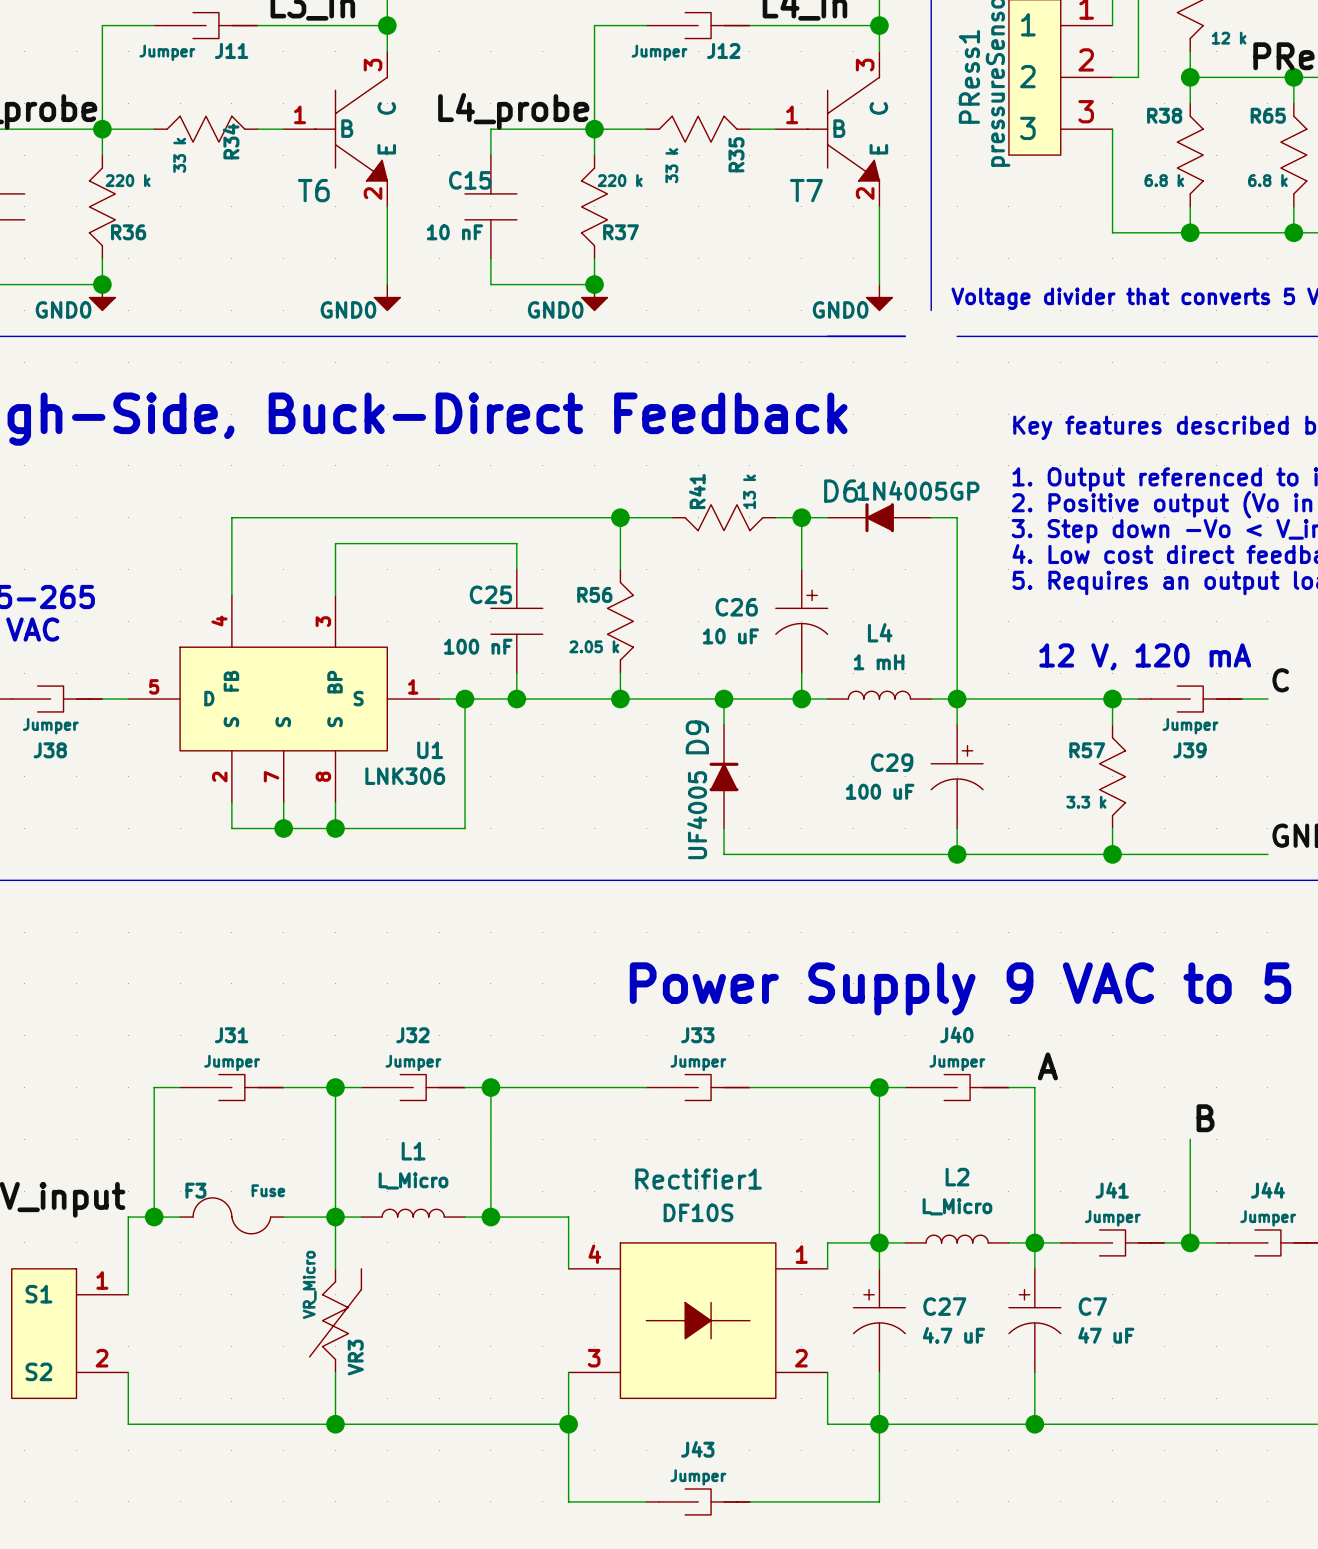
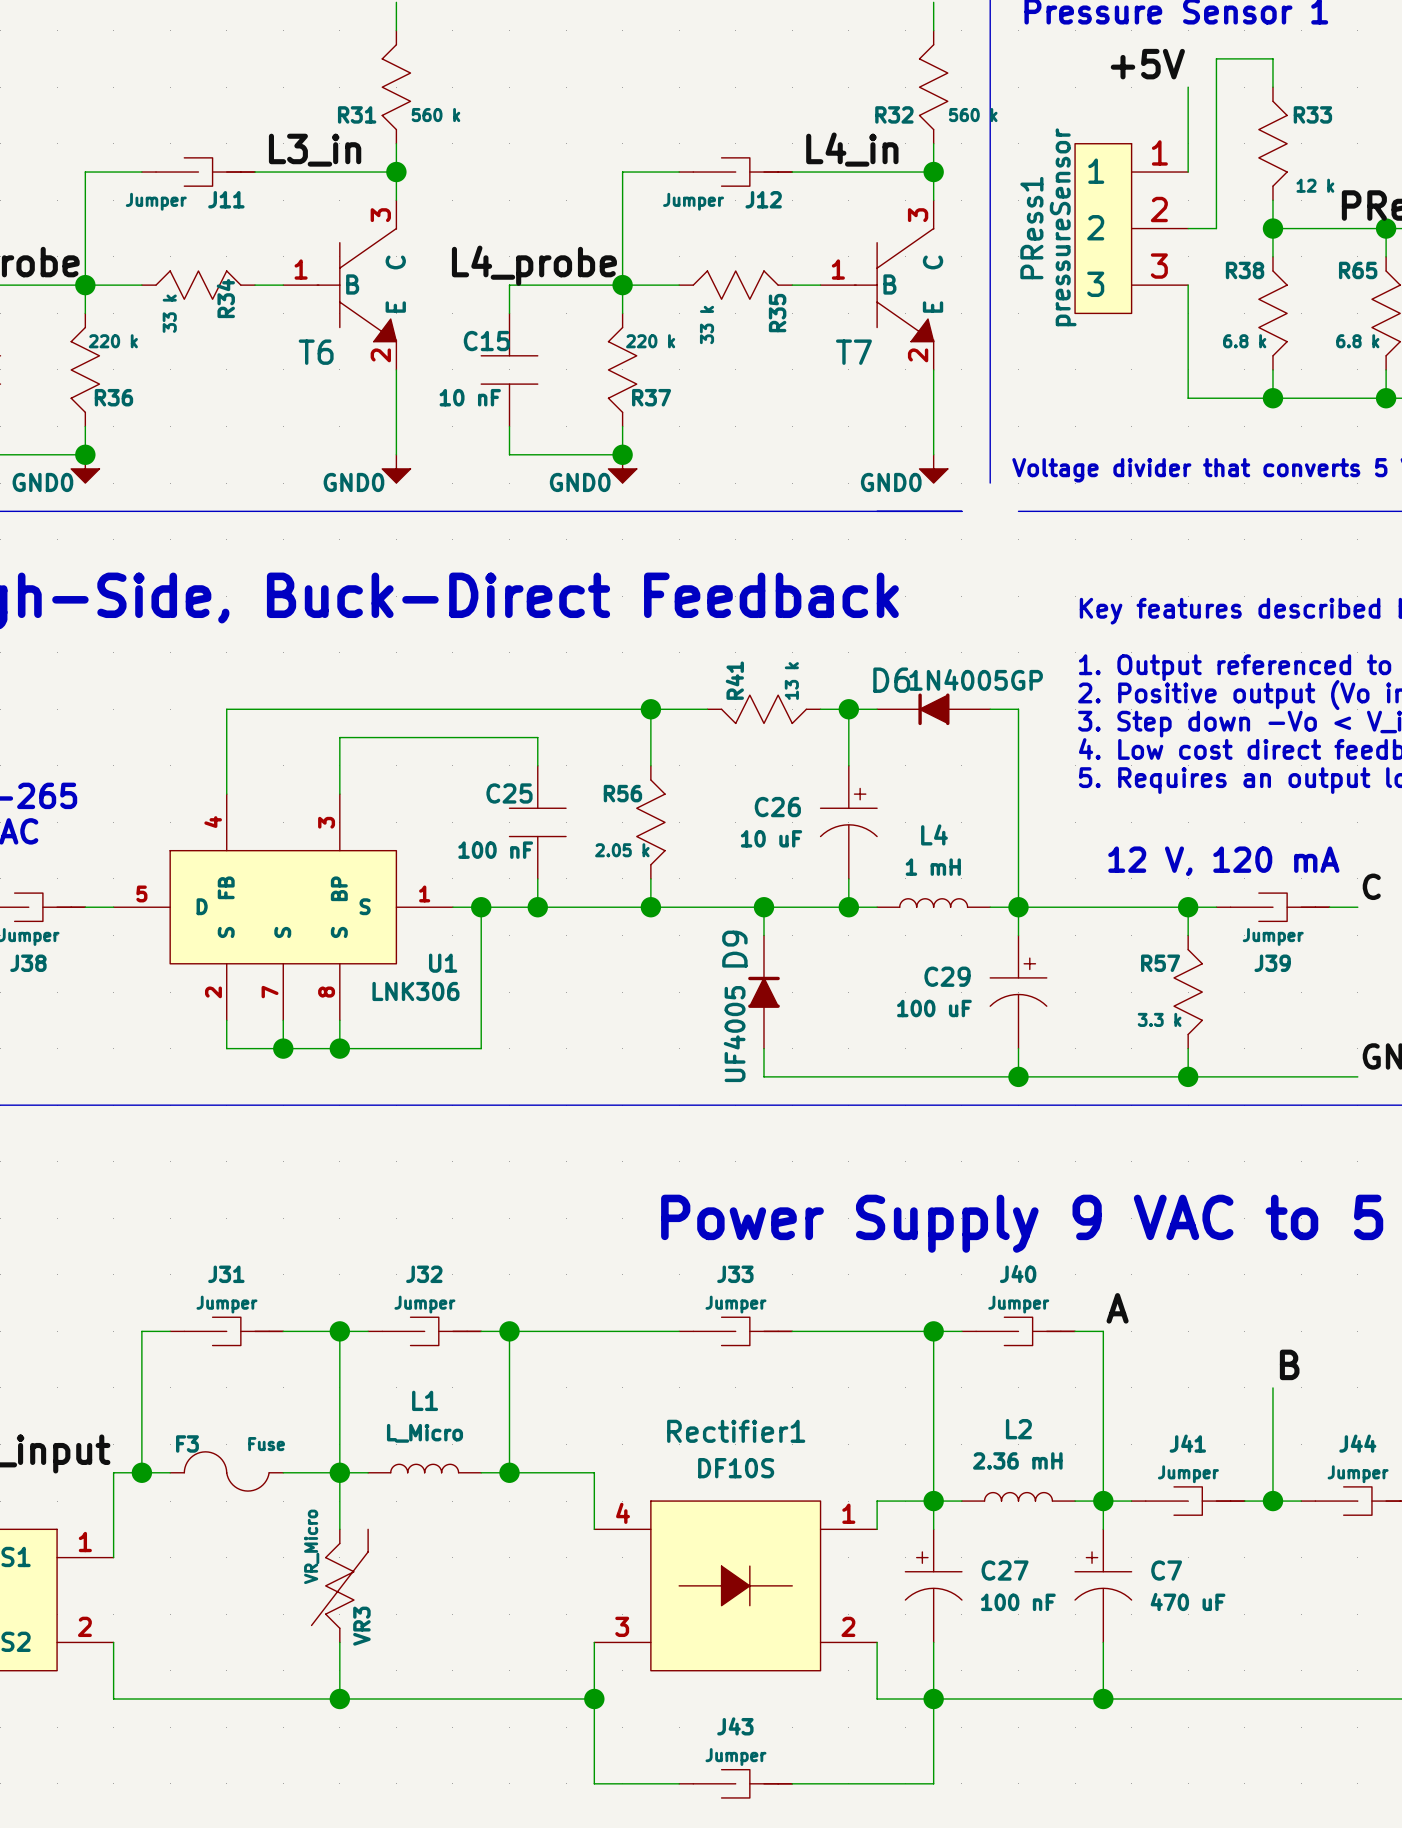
L2 value: L_Micro (957, 1206) -> 2.36 mH (1017, 1460)
C27 value: 4.7 uF (953, 1335) -> 100 nF (1018, 1602)
C7 value: 47 uF (1106, 1335) -> 470 uF (1188, 1601)

